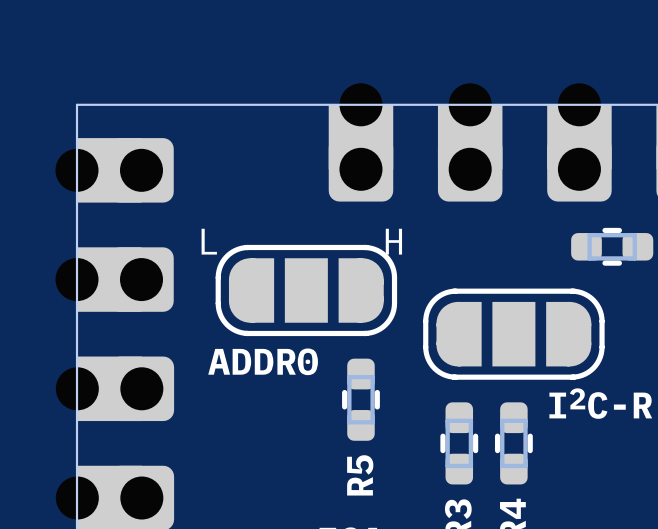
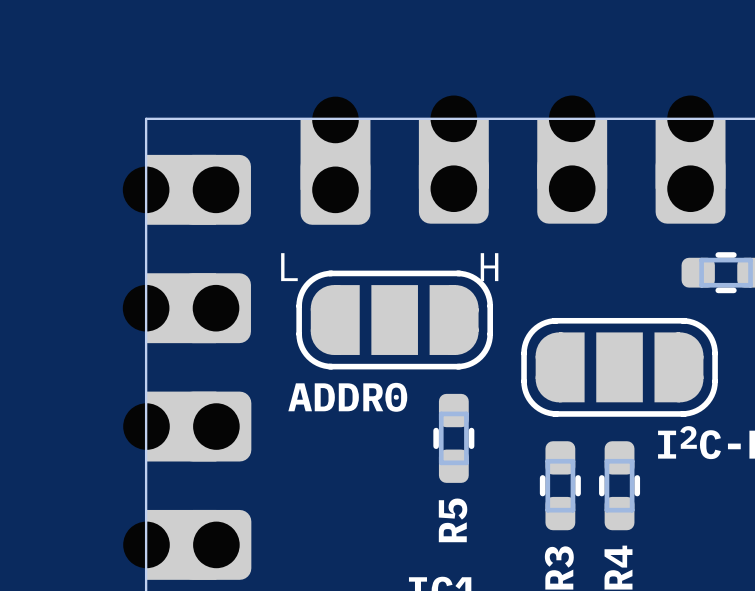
part: none -> (335, 160)

